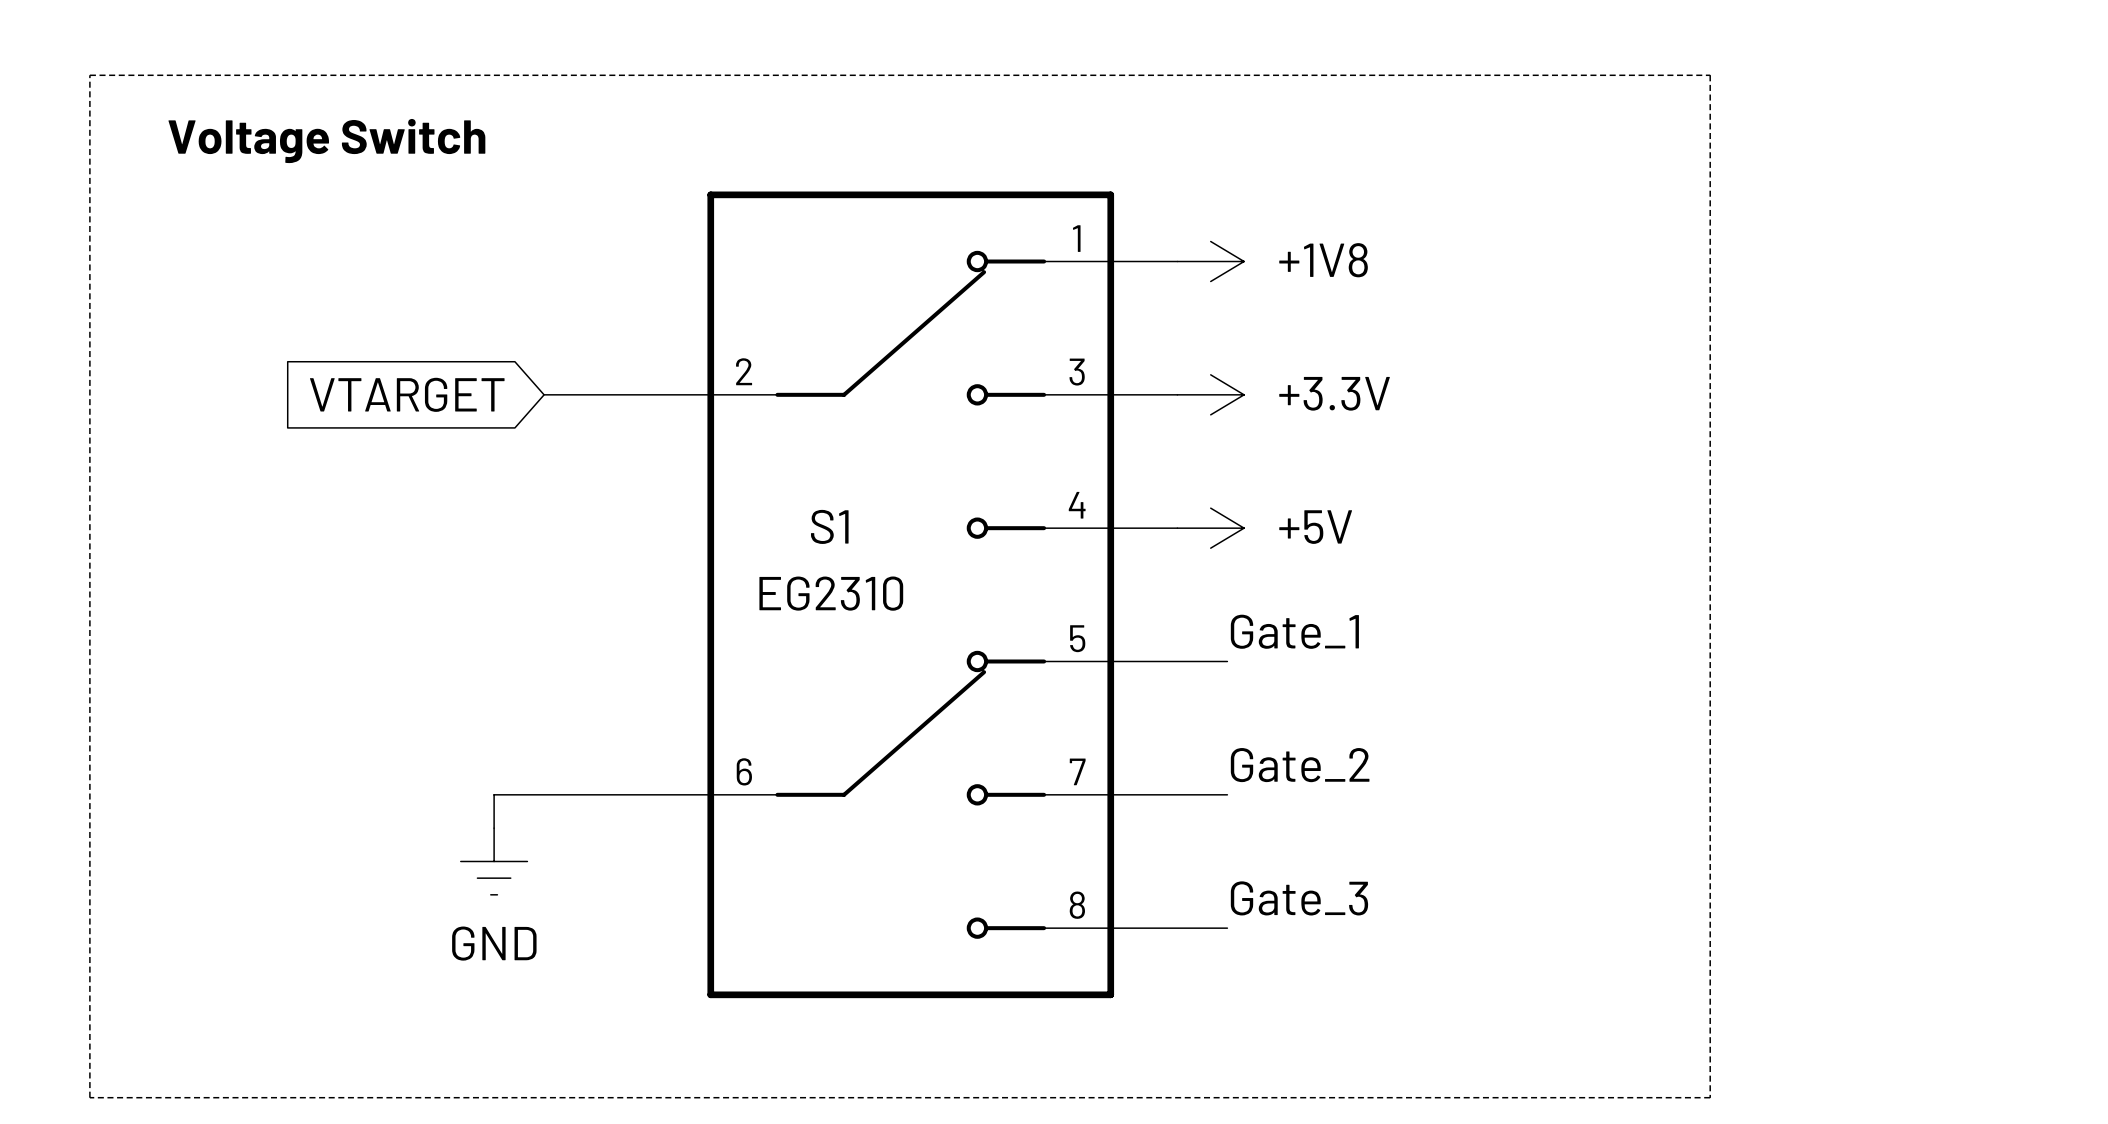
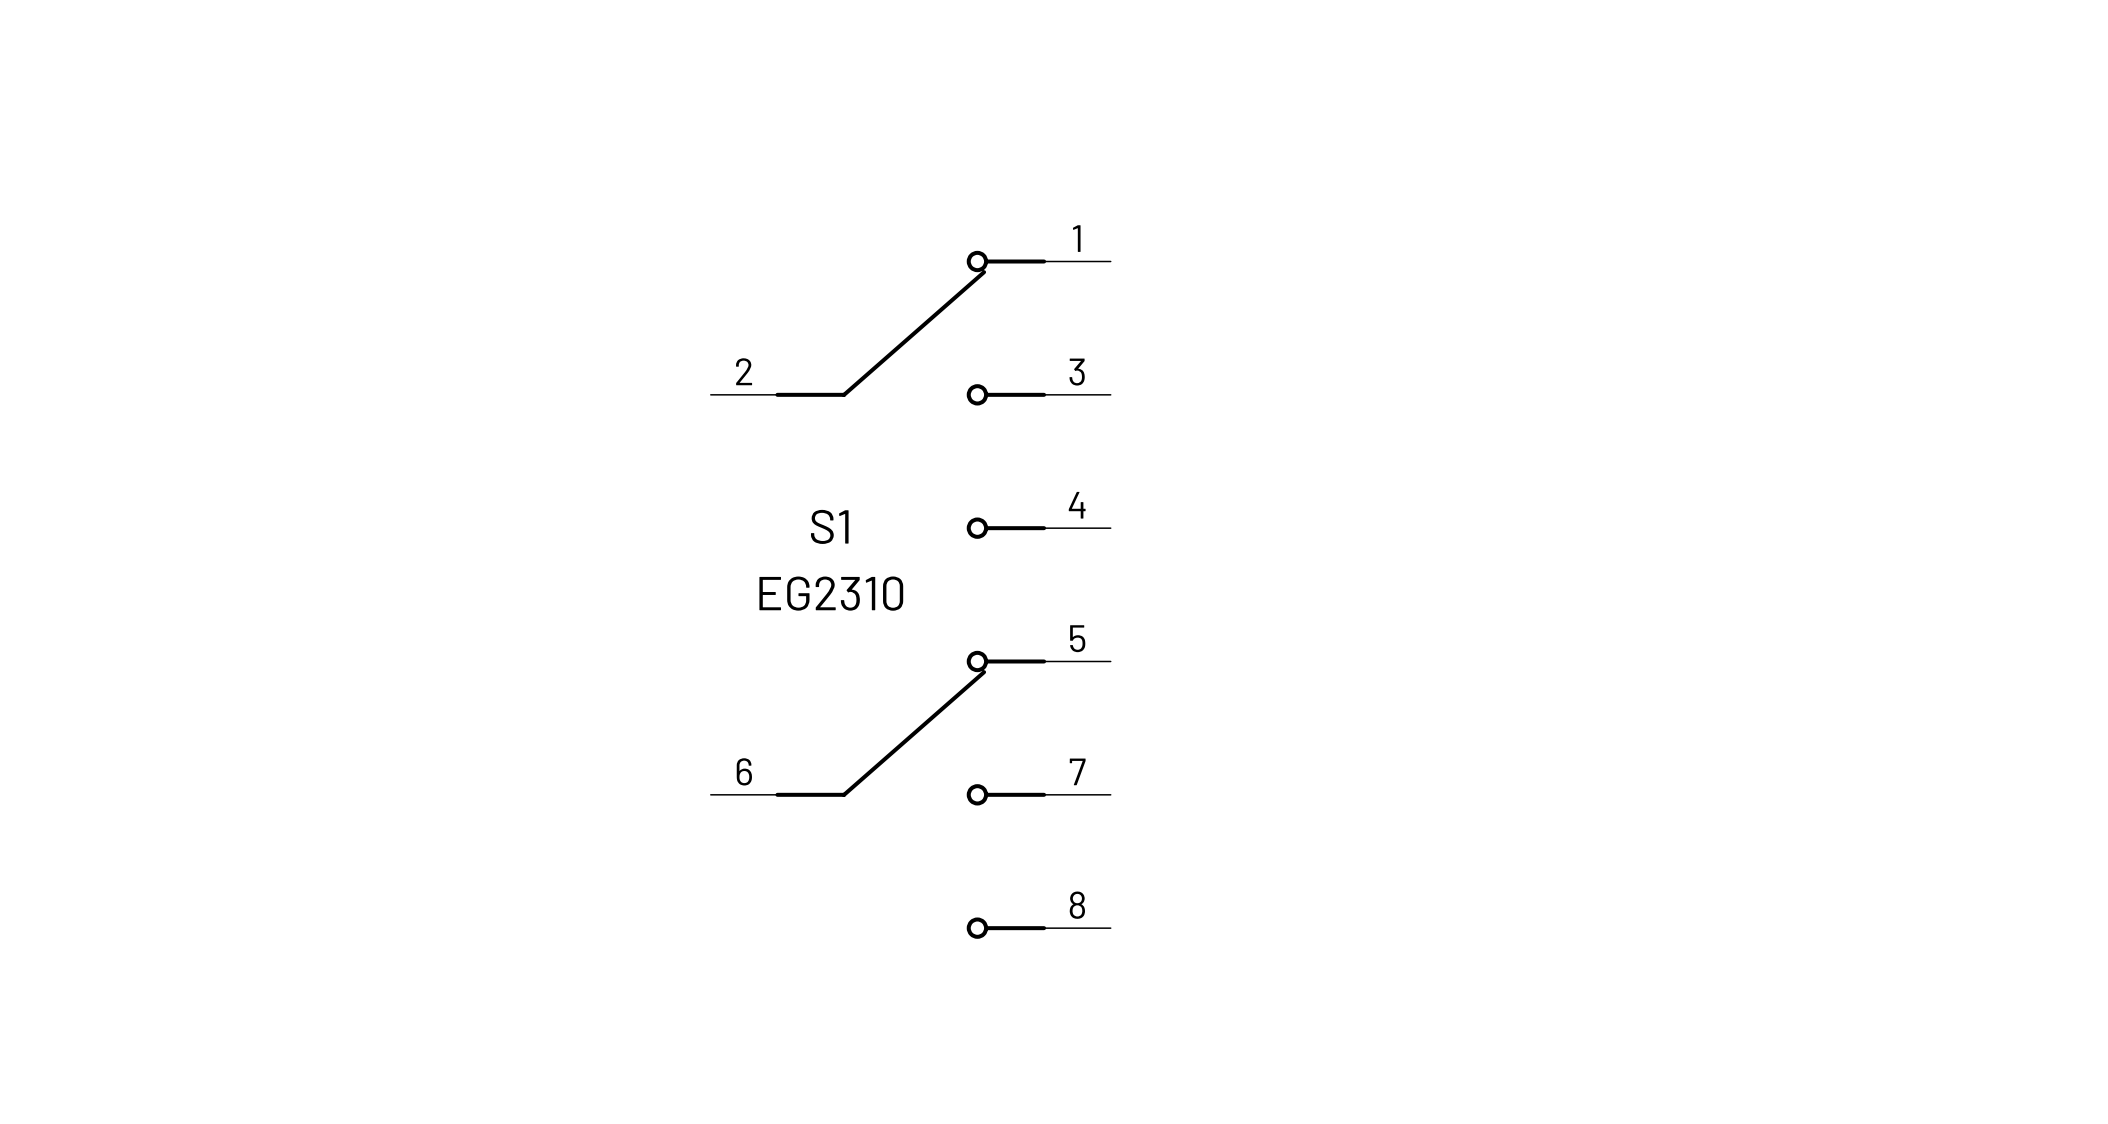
line: (89, 75) (1710, 75) (1710, 1097) (89, 1097) (89, 75) -> none
text: Voltage Switch (326, 141) -> none
line: (710, 194) (1110, 194) (1110, 994) (710, 994) (710, 194) -> none
wire: (1110, 261) (1177, 261) -> none
power symbol: +1V8 (1210, 261) -> none
global label: VTARGET (407, 394) -> none
wire: (544, 394) (710, 394) -> none
wire: (1110, 394) (1177, 394) -> none
power symbol: +3.3V (1210, 394) -> none
wire: (1110, 528) (1177, 528) -> none
power symbol: +5V (1210, 528) -> none
label: Gate_1 (1294, 631) -> none
wire: (1110, 661) (1227, 661) -> none
label: Gate_2 (1300, 765) -> none
wire: (710, 794) (494, 794) (494, 828) -> none
wire: (1110, 794) (1227, 794) -> none
power symbol: GND (494, 861) -> none
label: Gate_3 (1299, 898) -> none
wire: (1110, 928) (1227, 928) -> none

